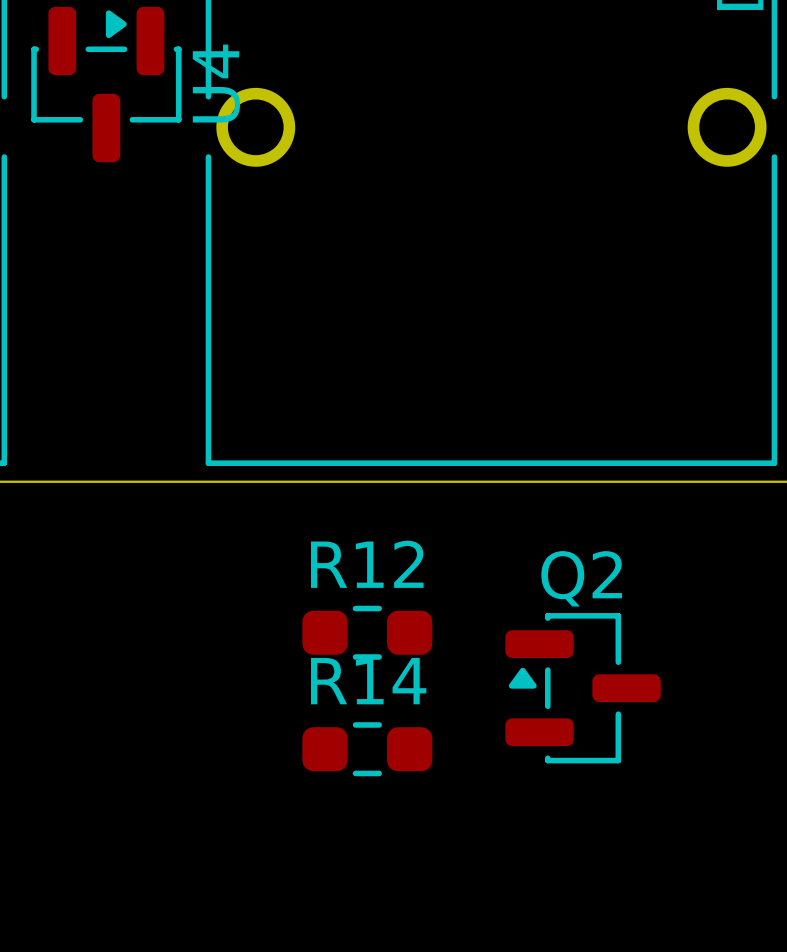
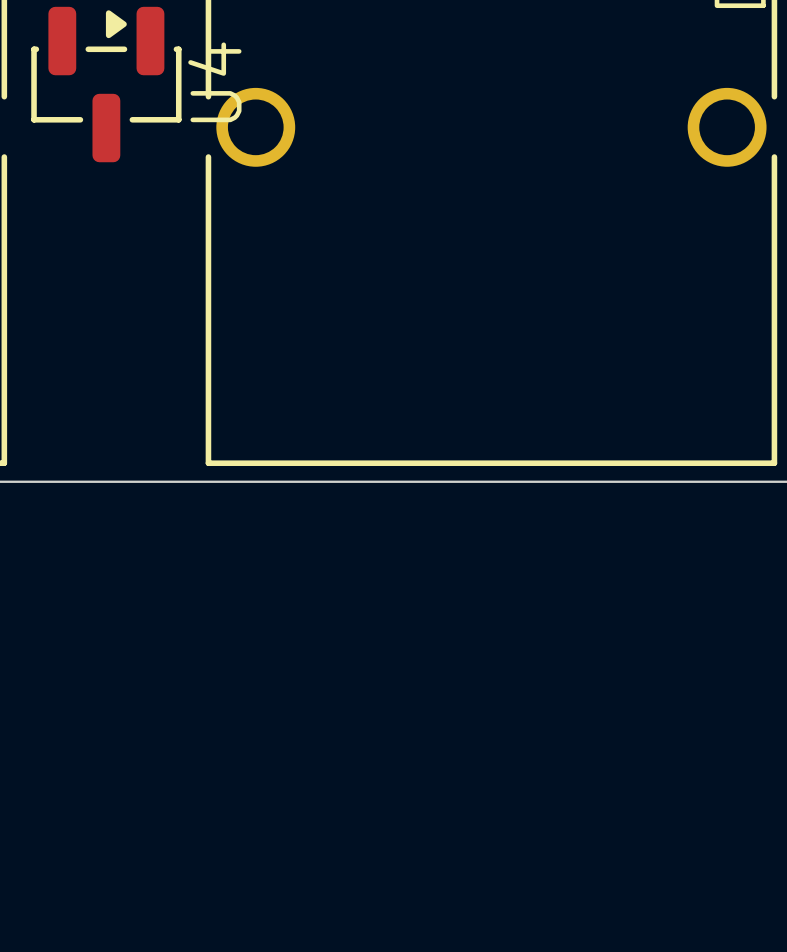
R12: (367, 632) -> none
Q2: (583, 688) -> none
R14: (367, 749) -> none

